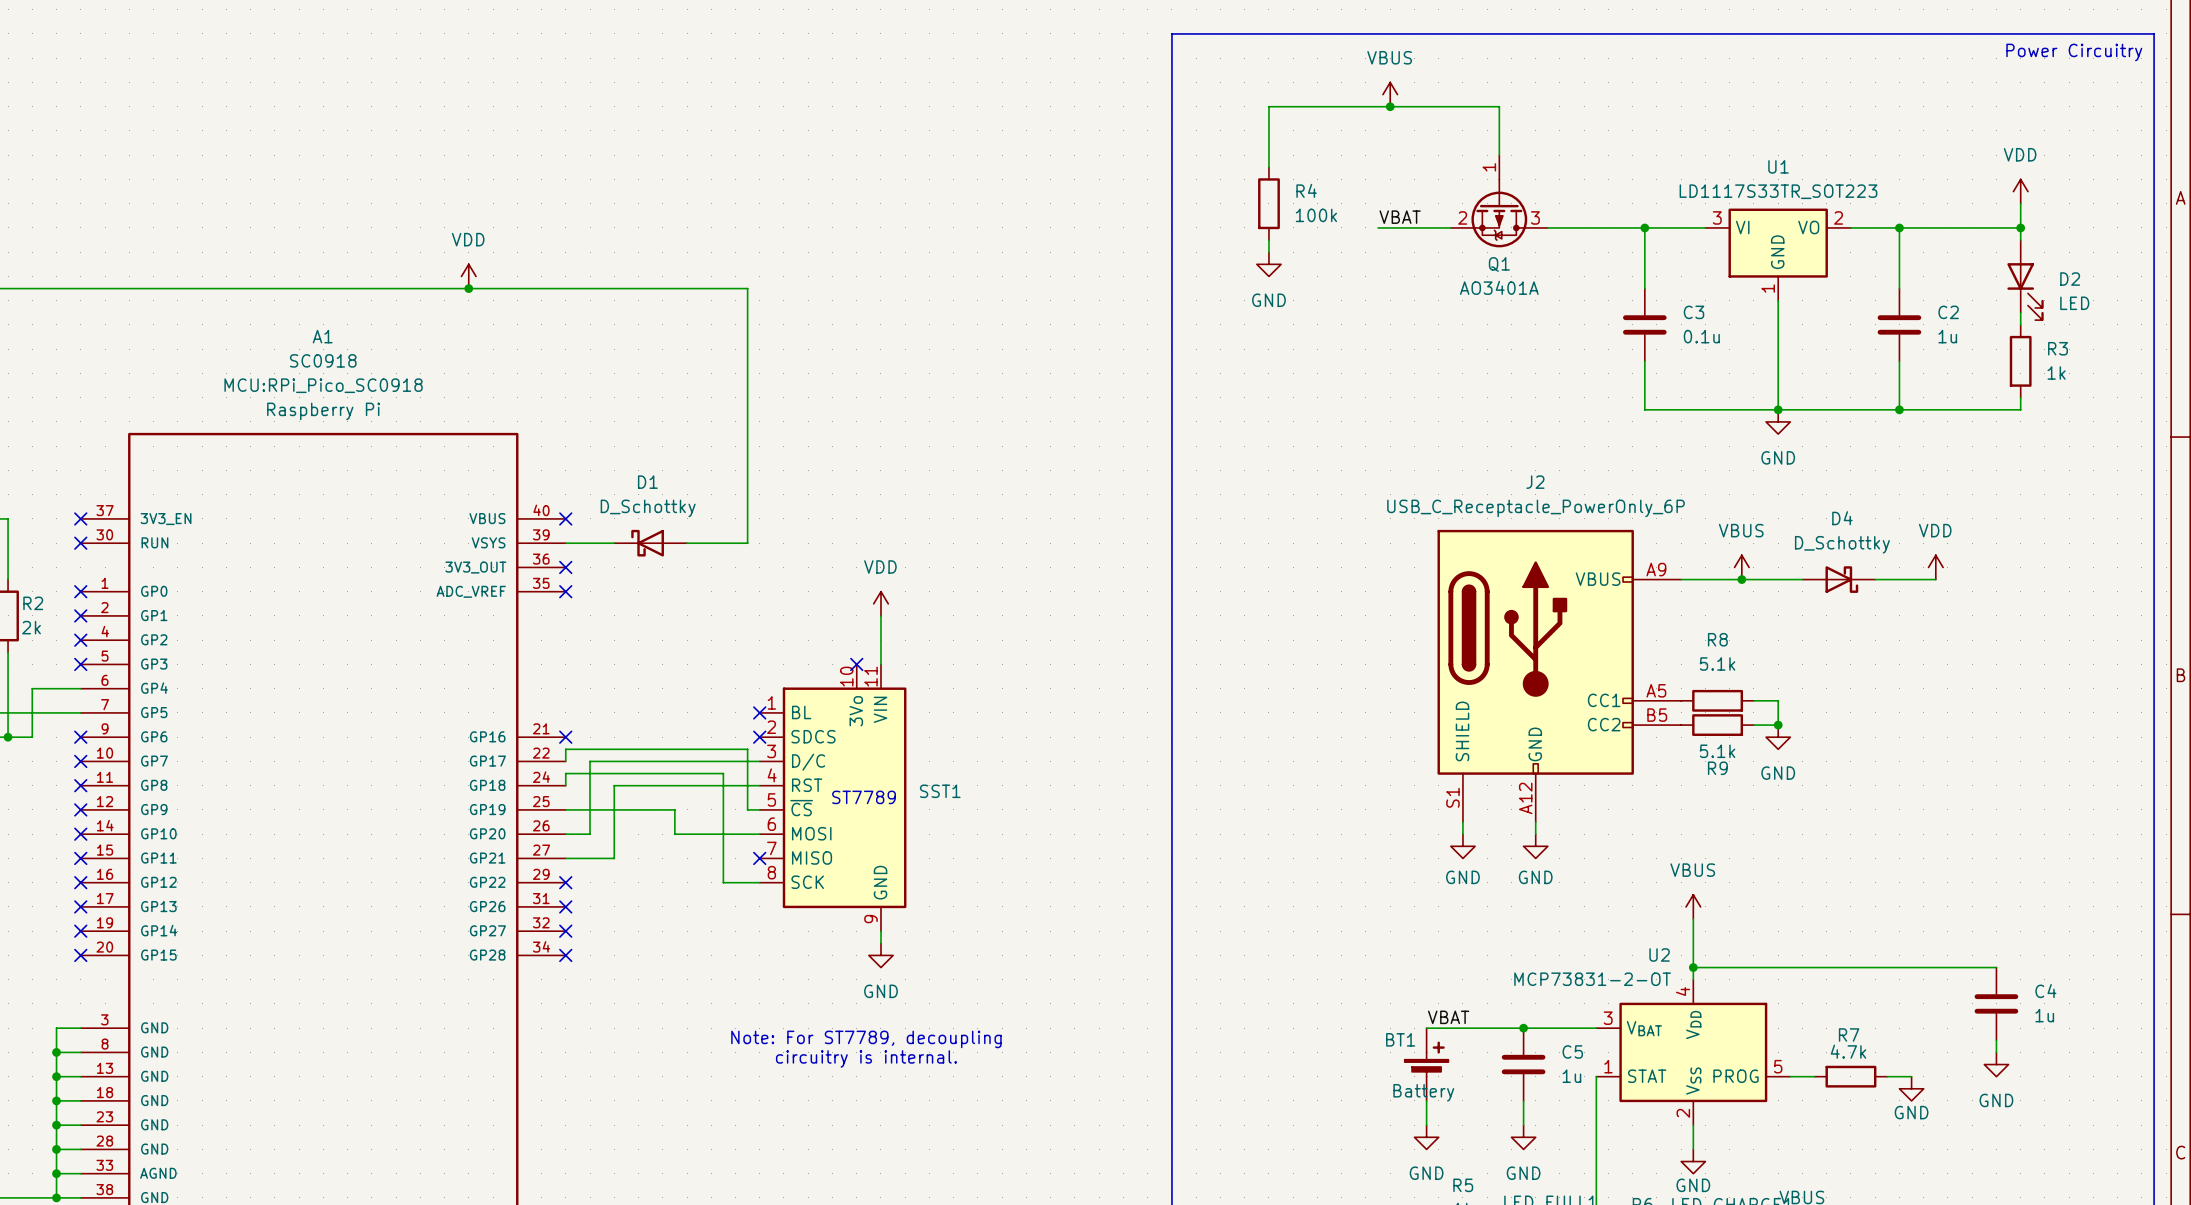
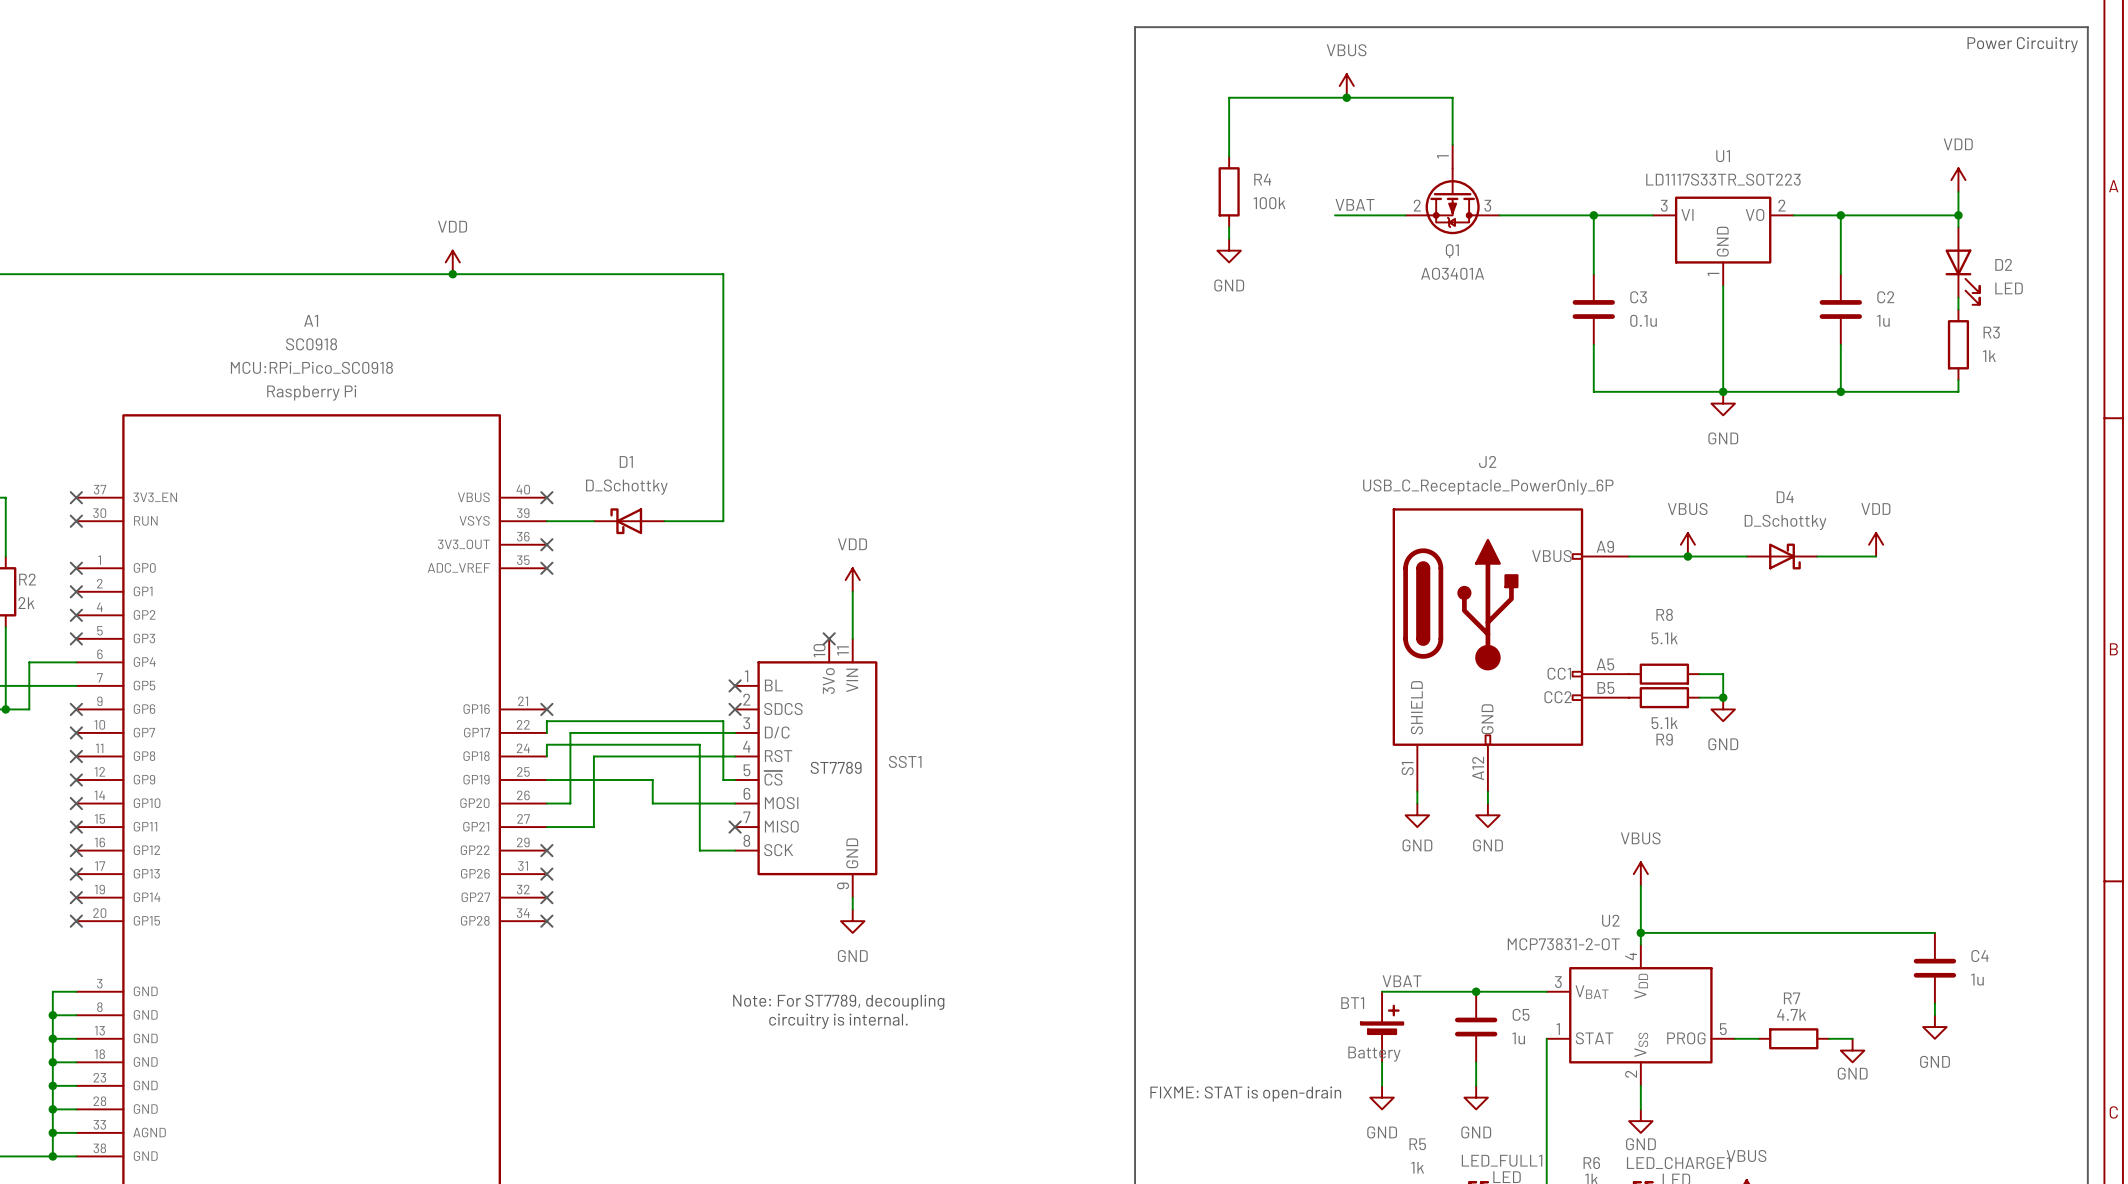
text: none -> FIXME: STAT is open-drain (1245, 1094)

